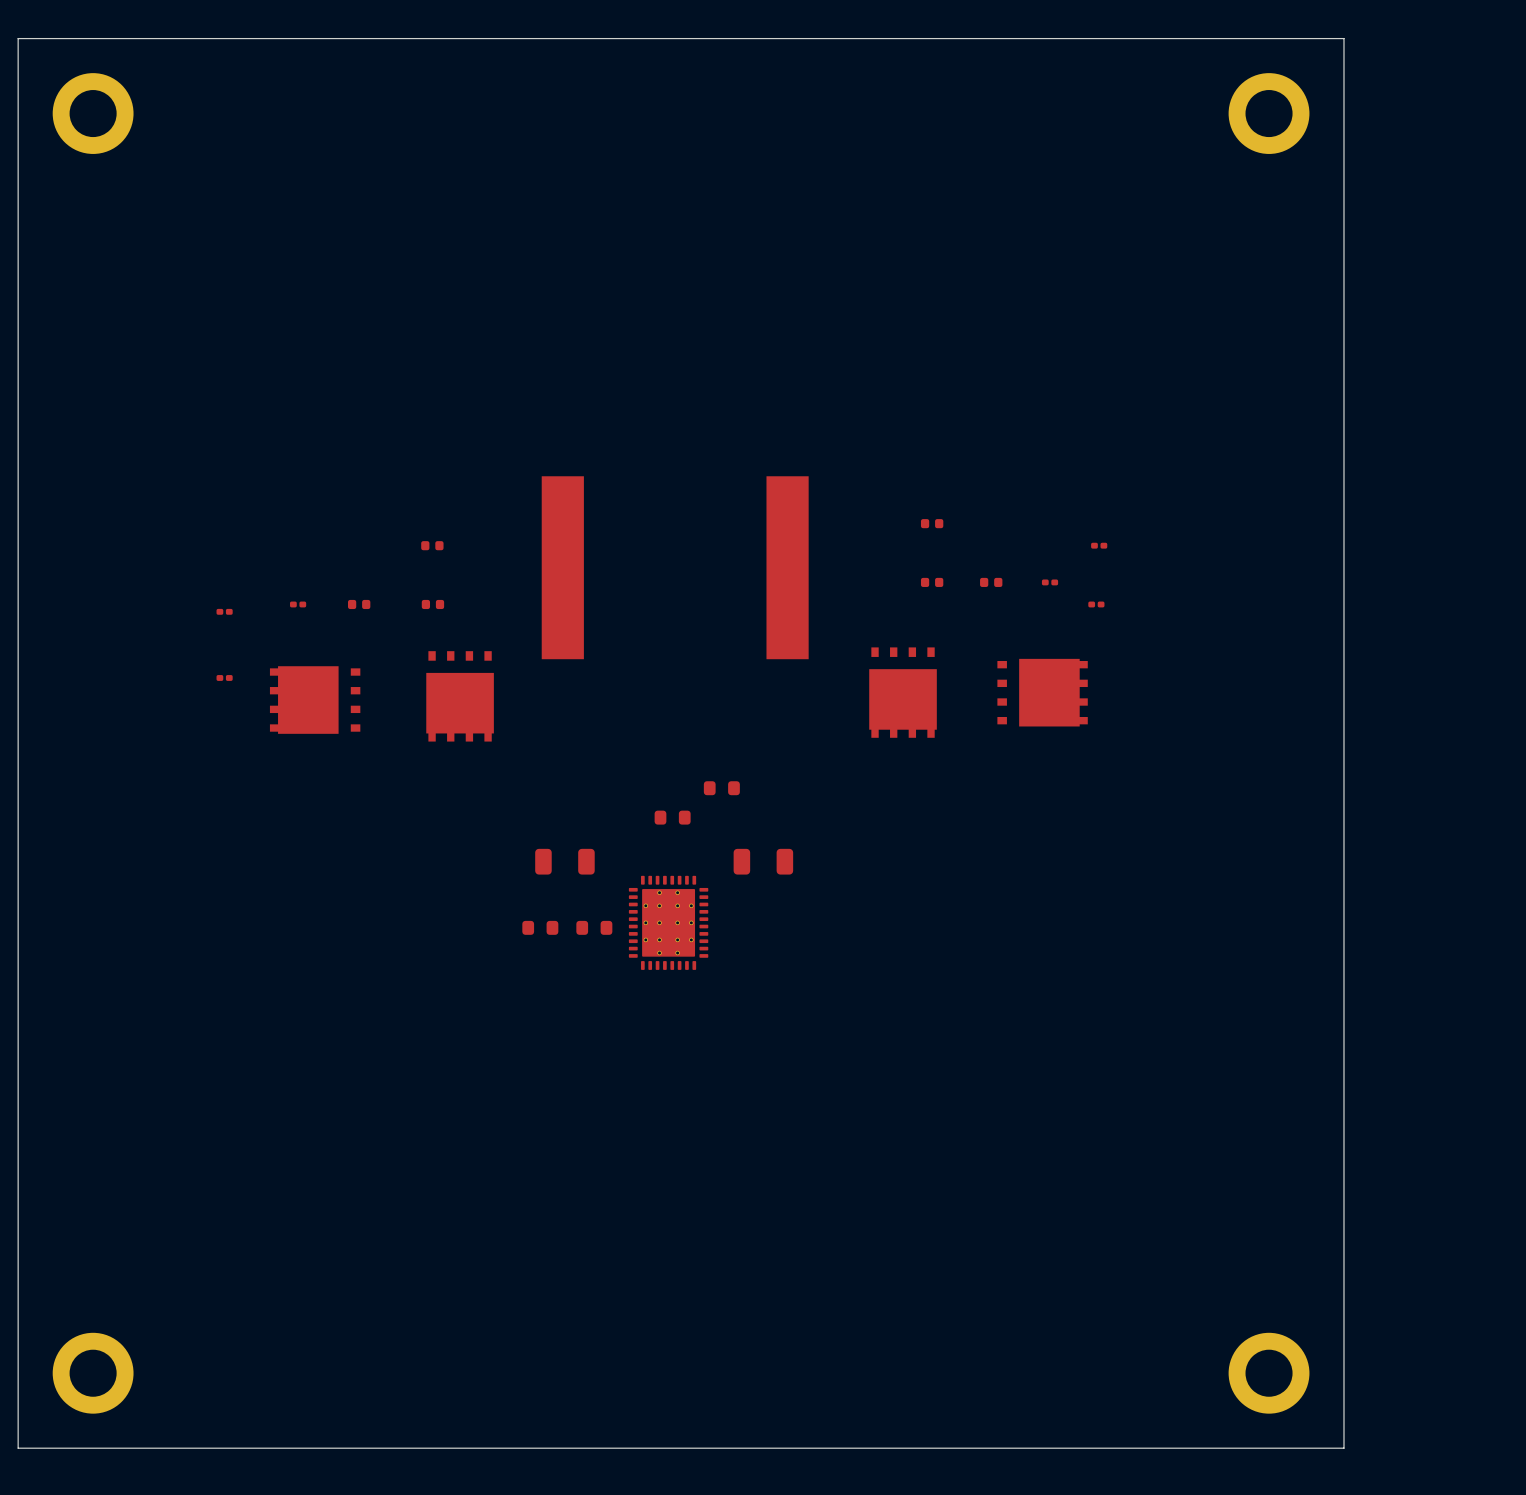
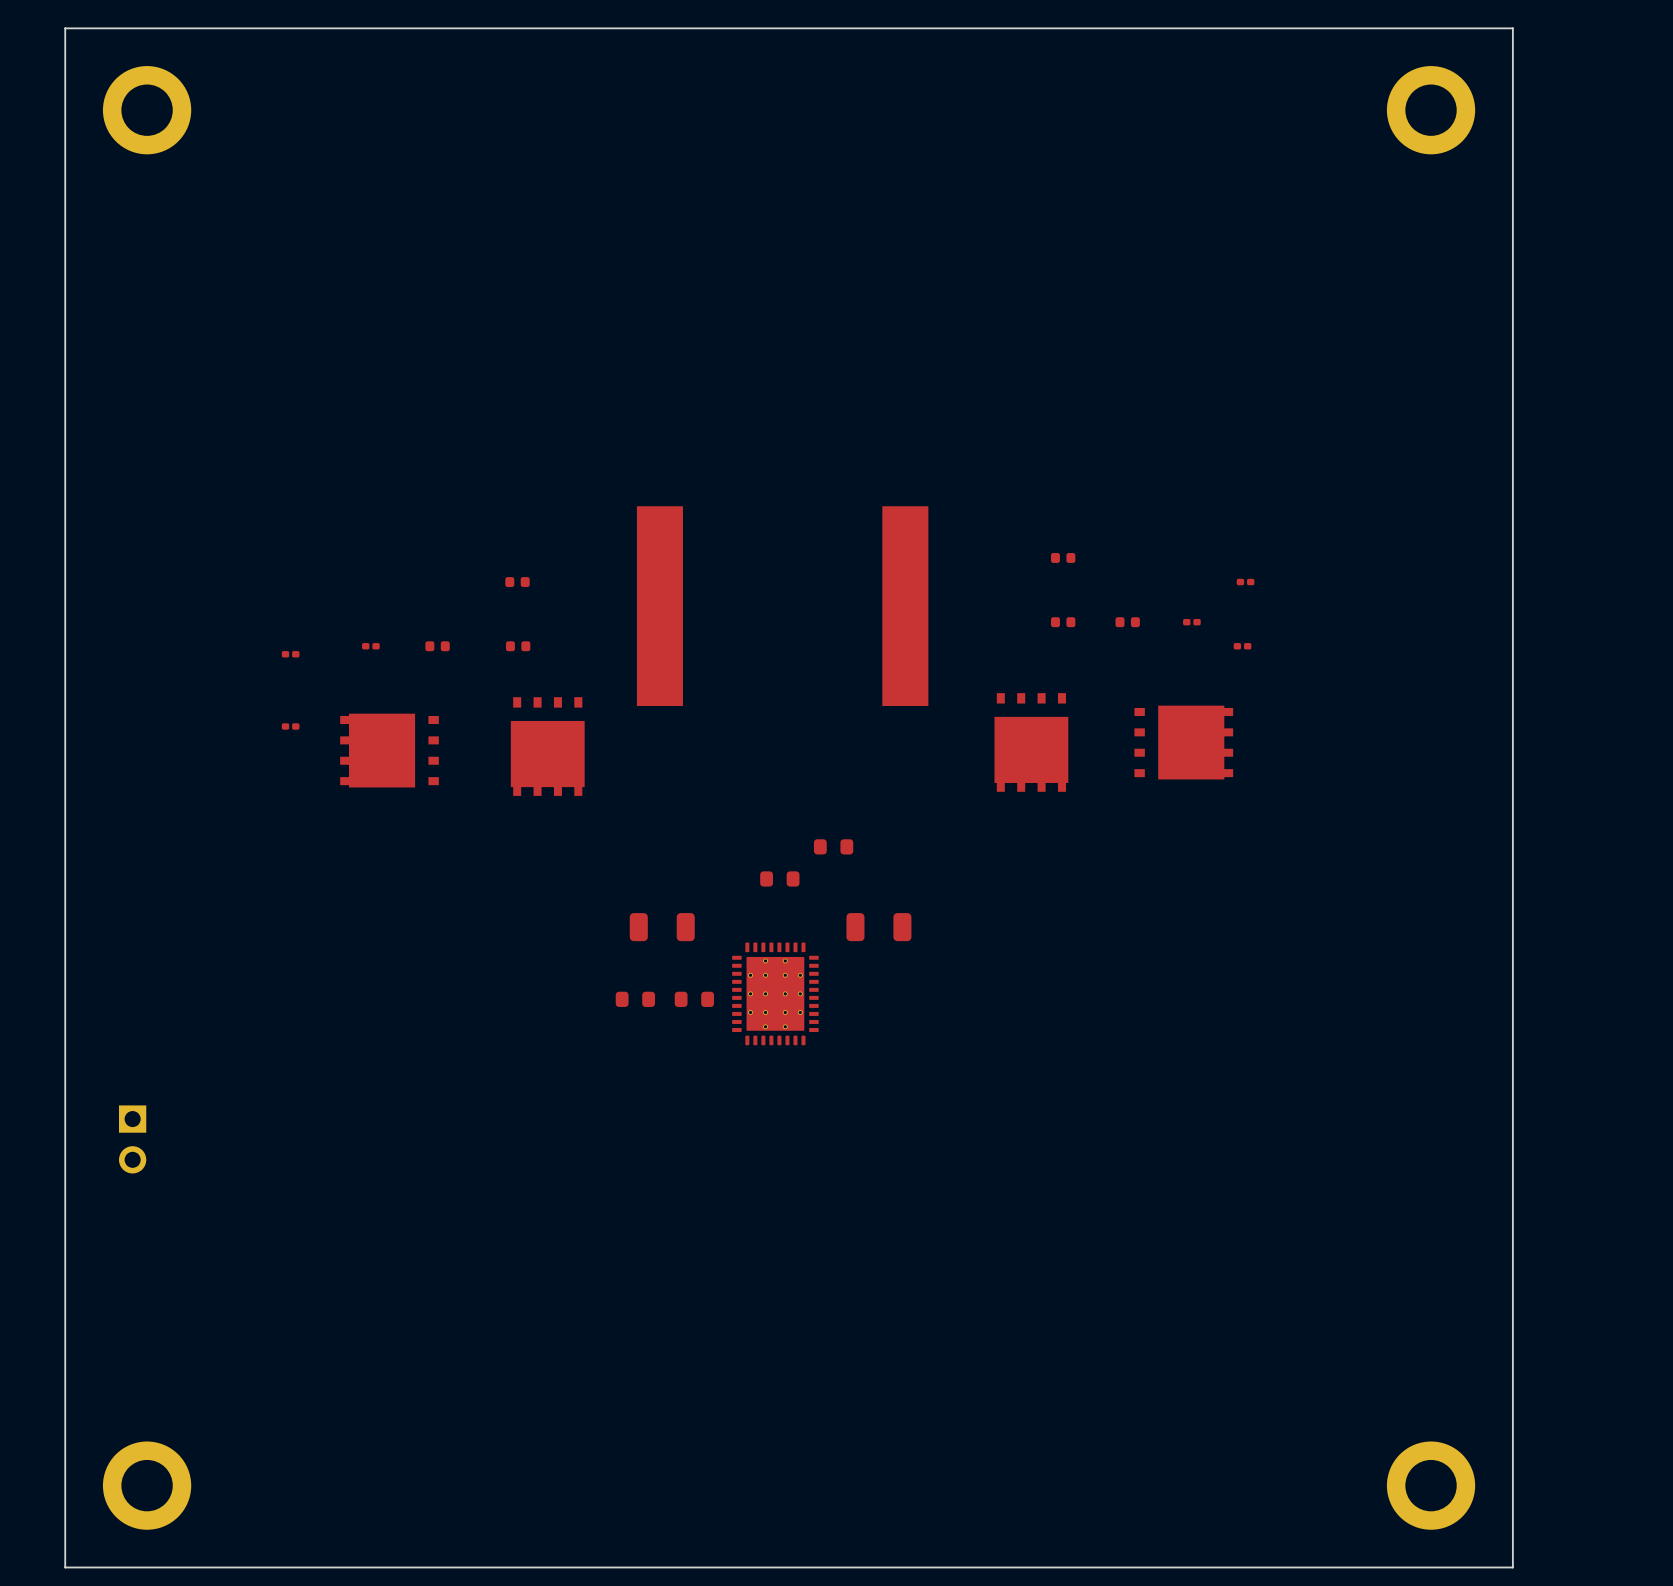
part: none -> (132, 1139)

